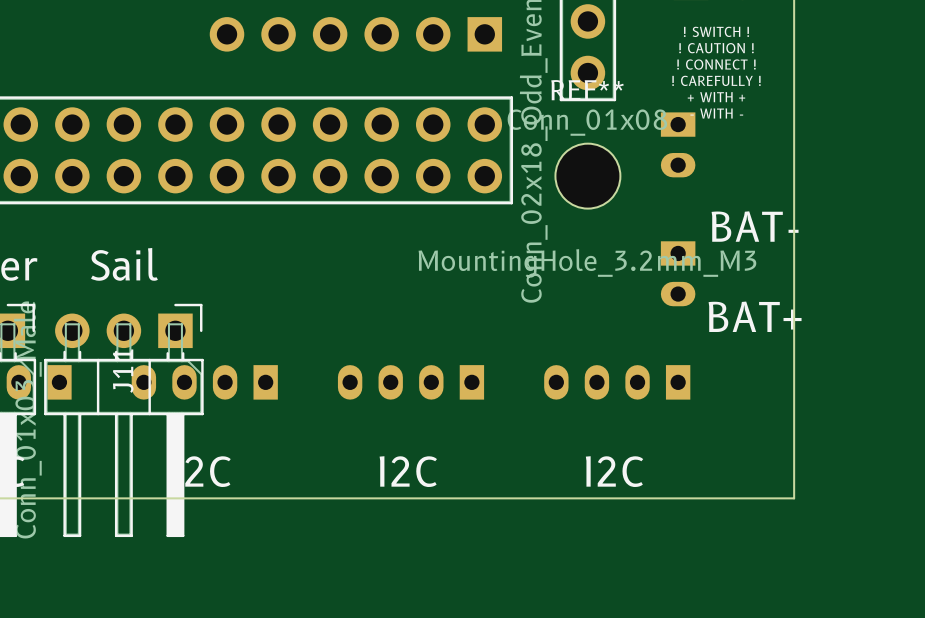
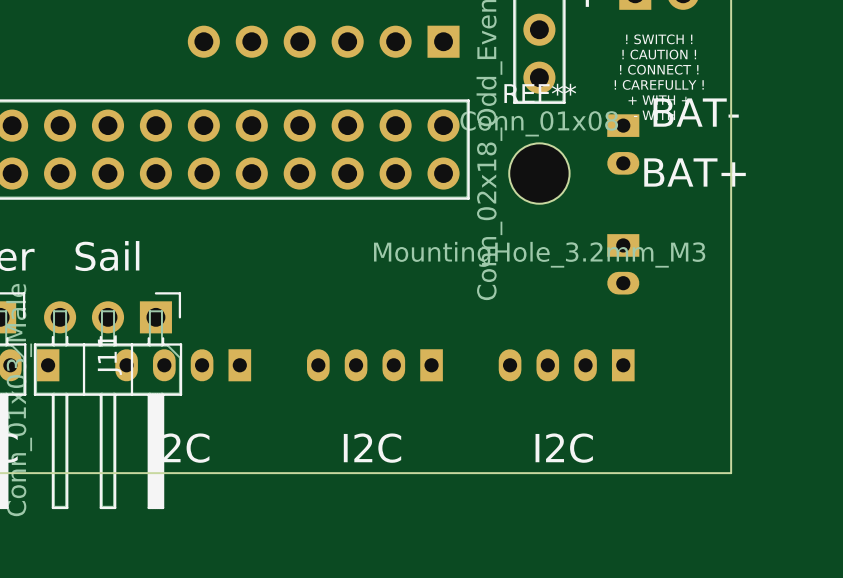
text position: BAT- (755, 226) -> BAT- (696, 112)
text position: BAT+ (755, 316) -> BAT+ (695, 172)

